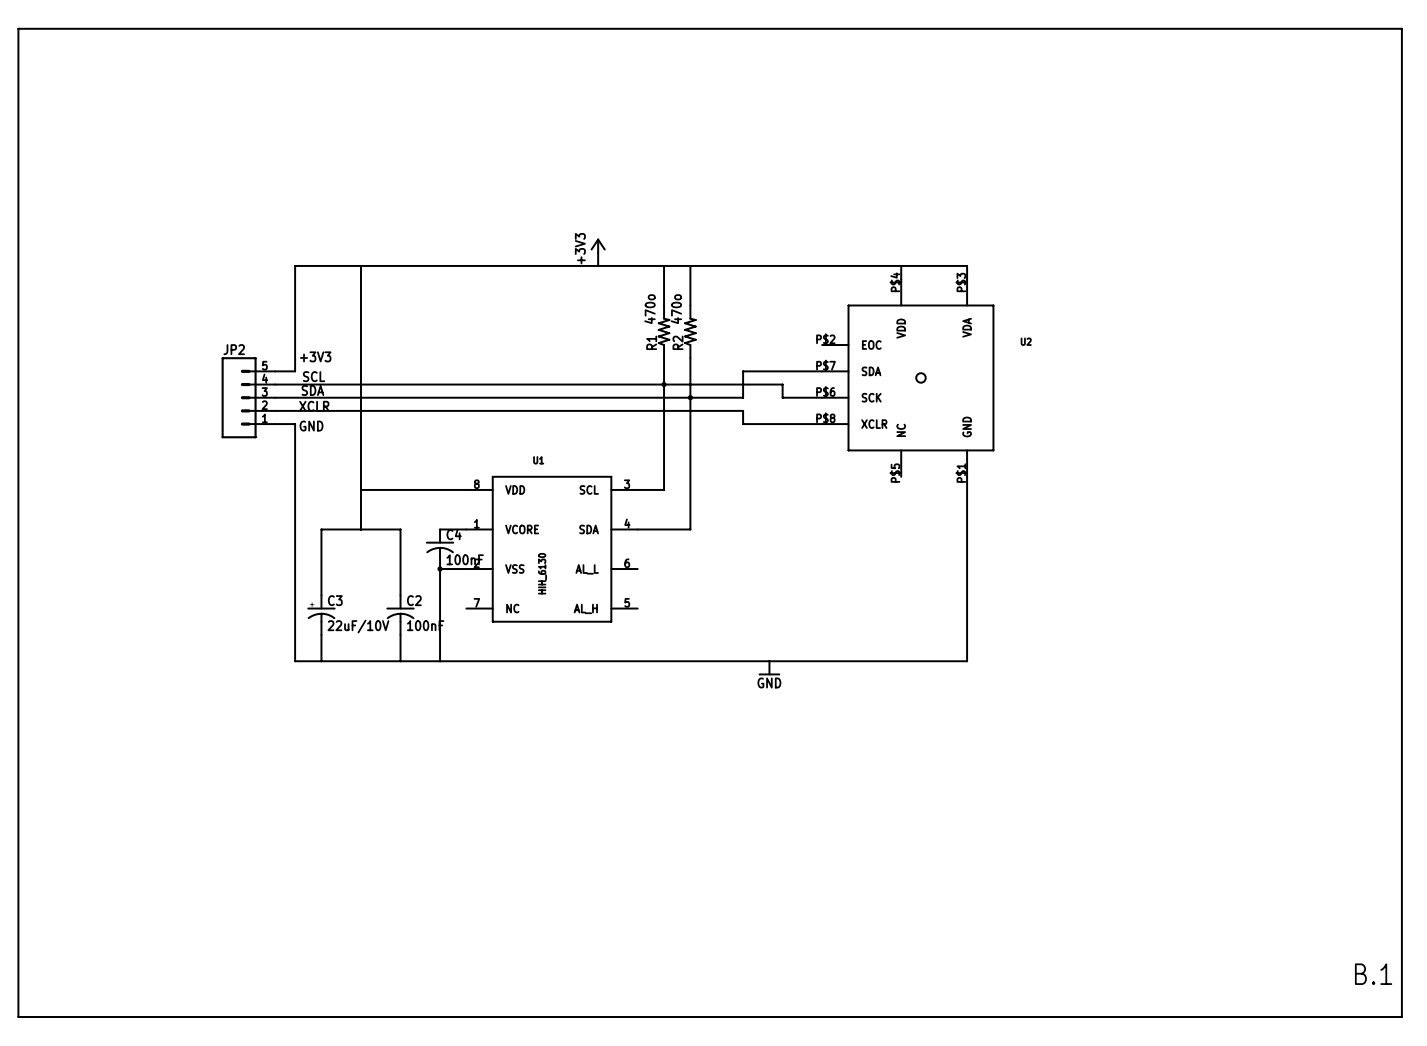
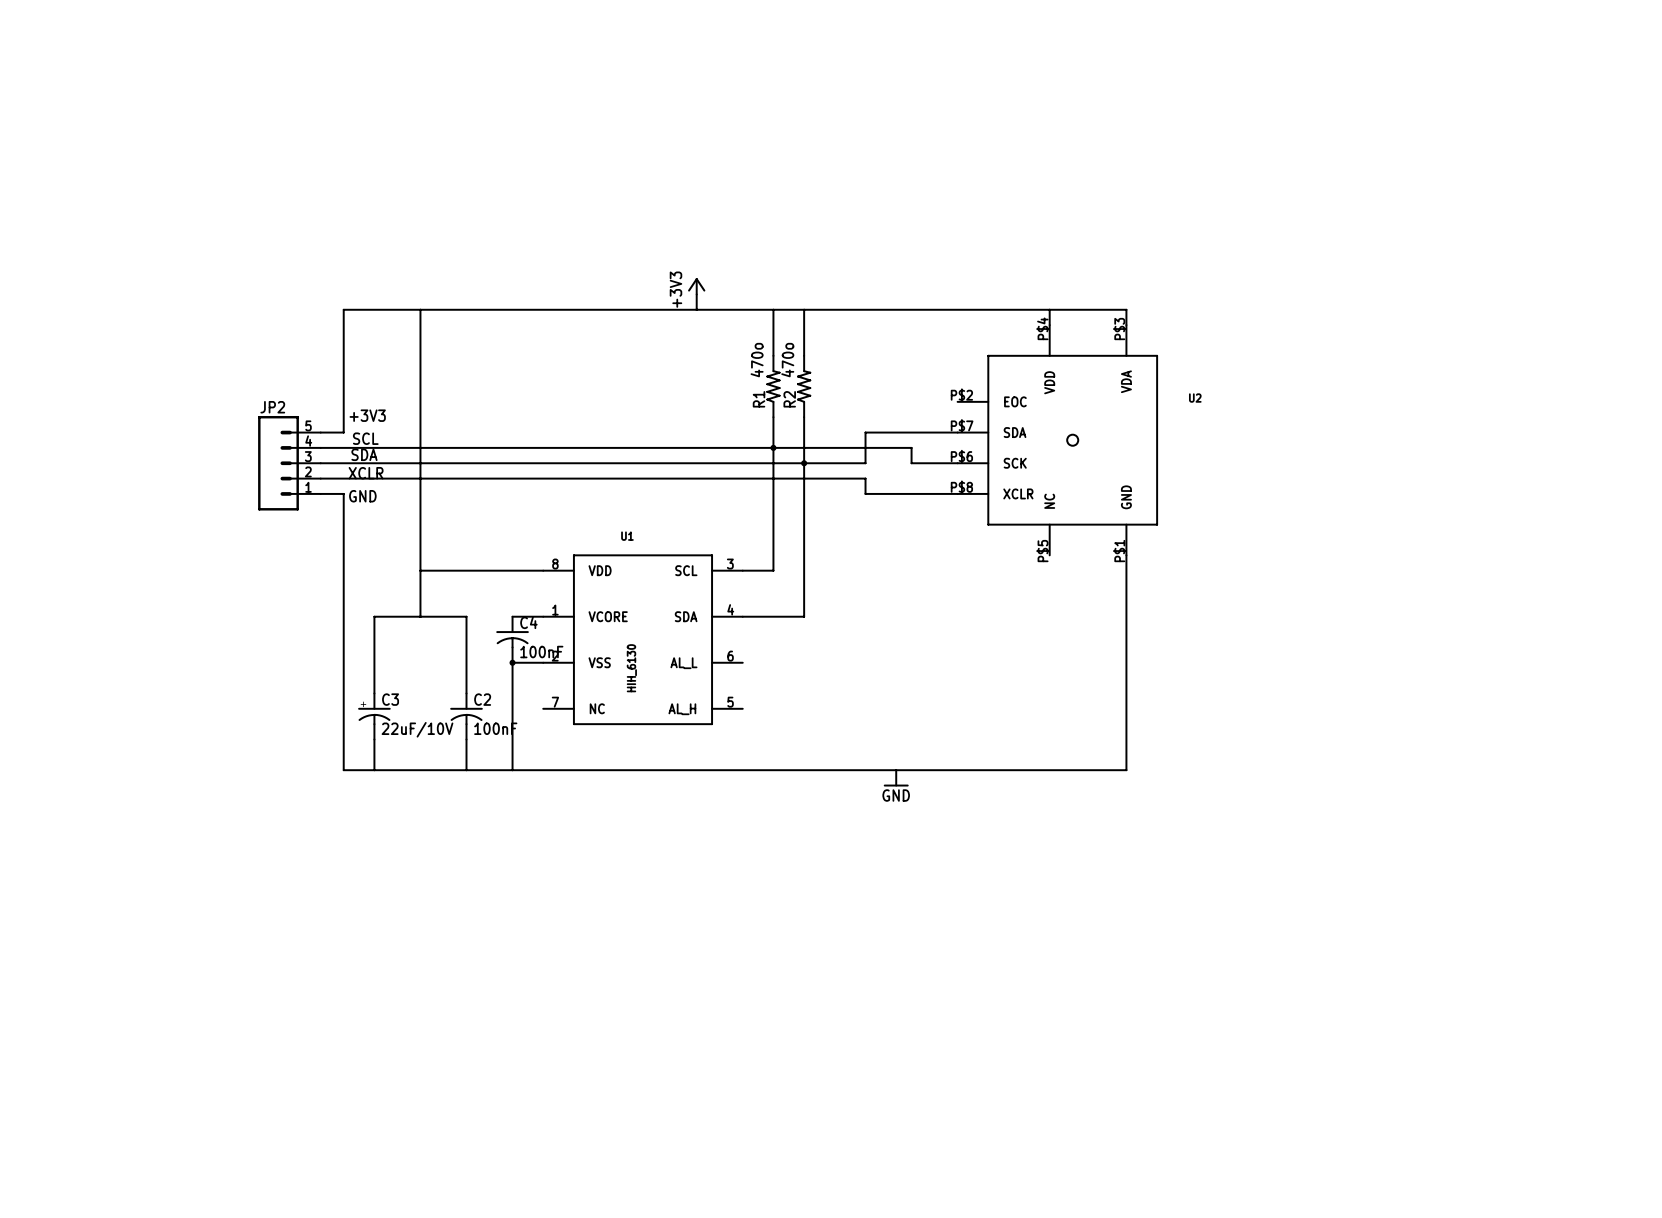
part: (710, 522) -> none
text: B.1 (1373, 974) -> none

